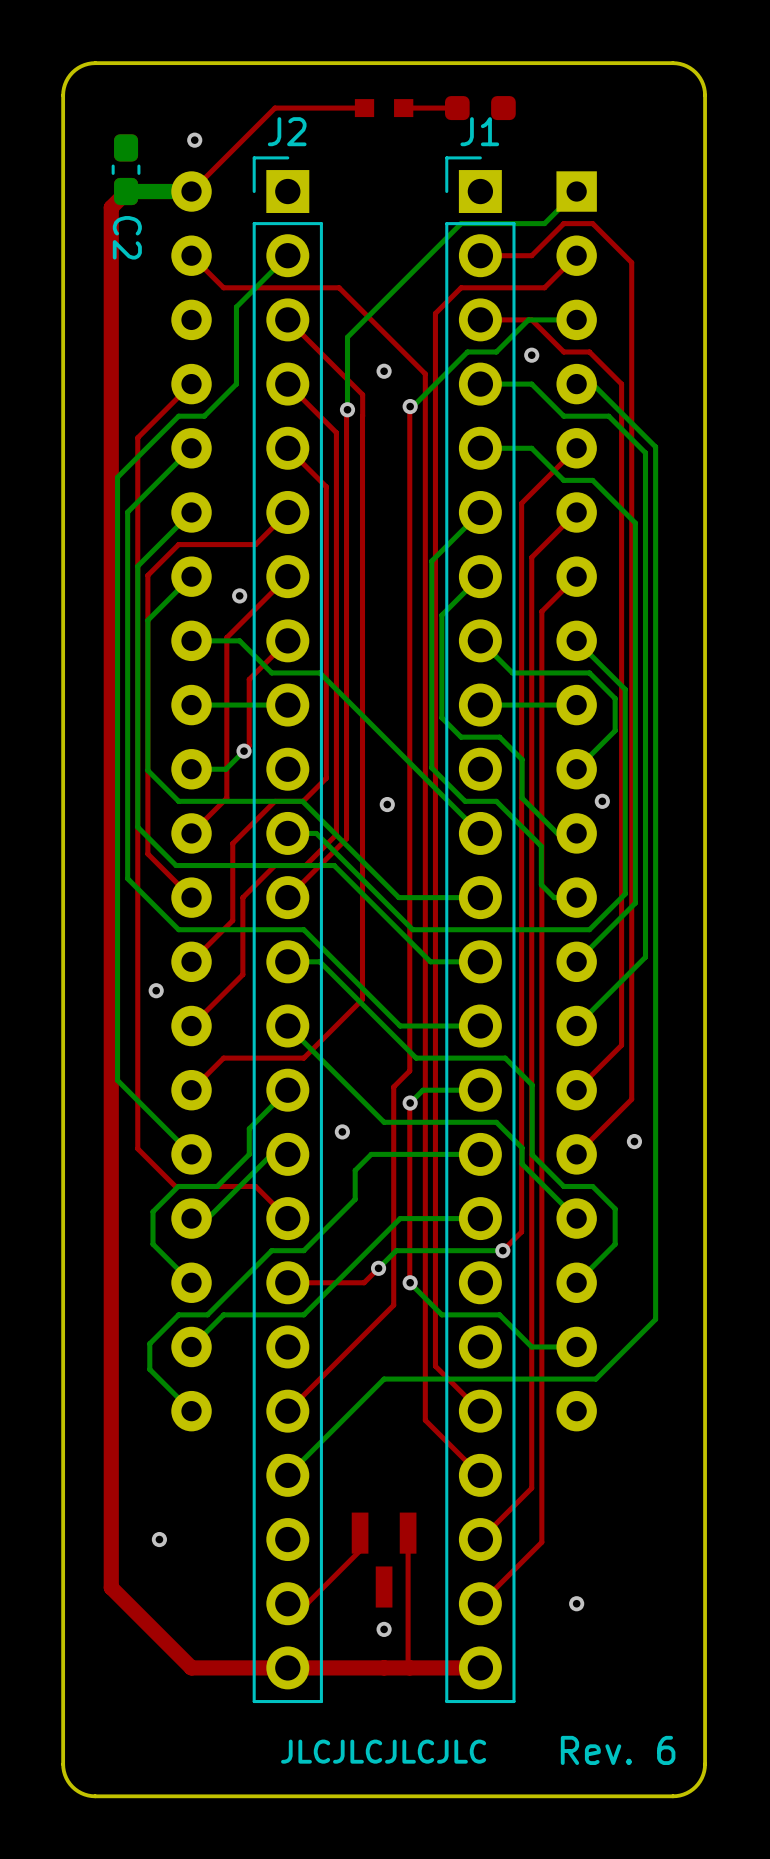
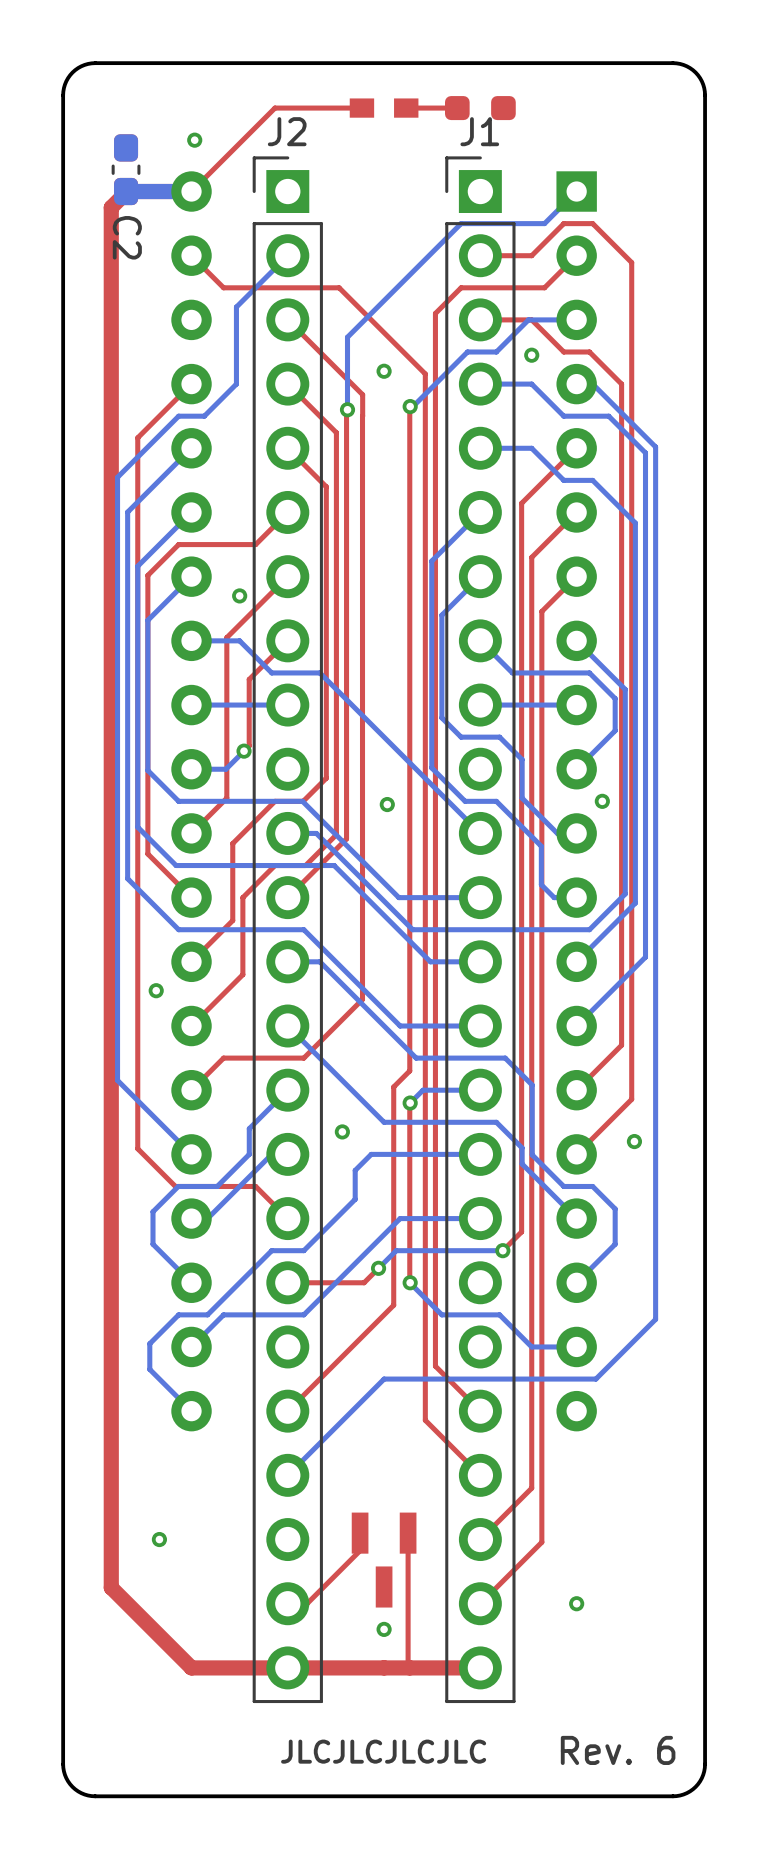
part footprint: [354, 99, 414, 118] -> [349, 98, 419, 118]

